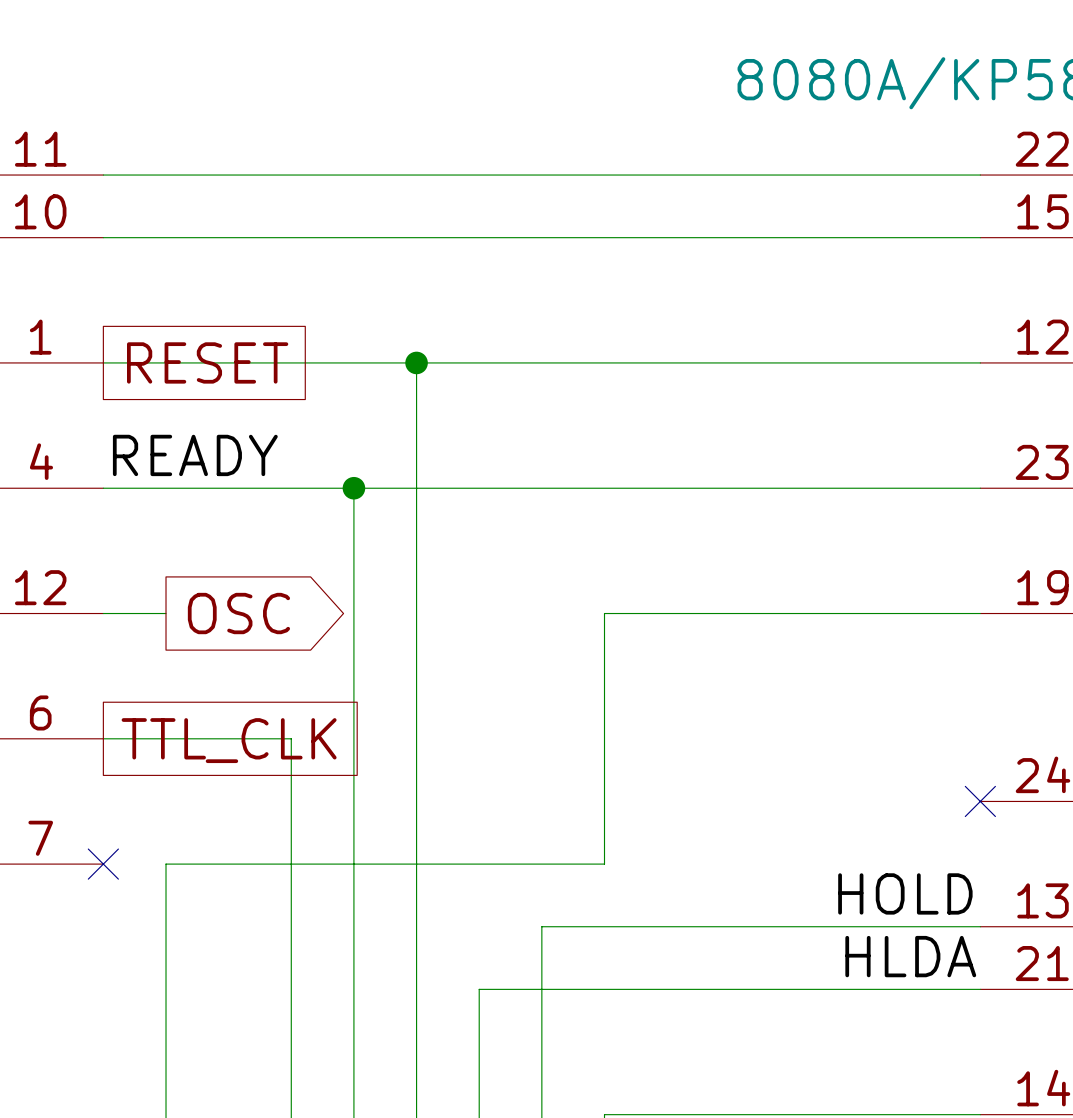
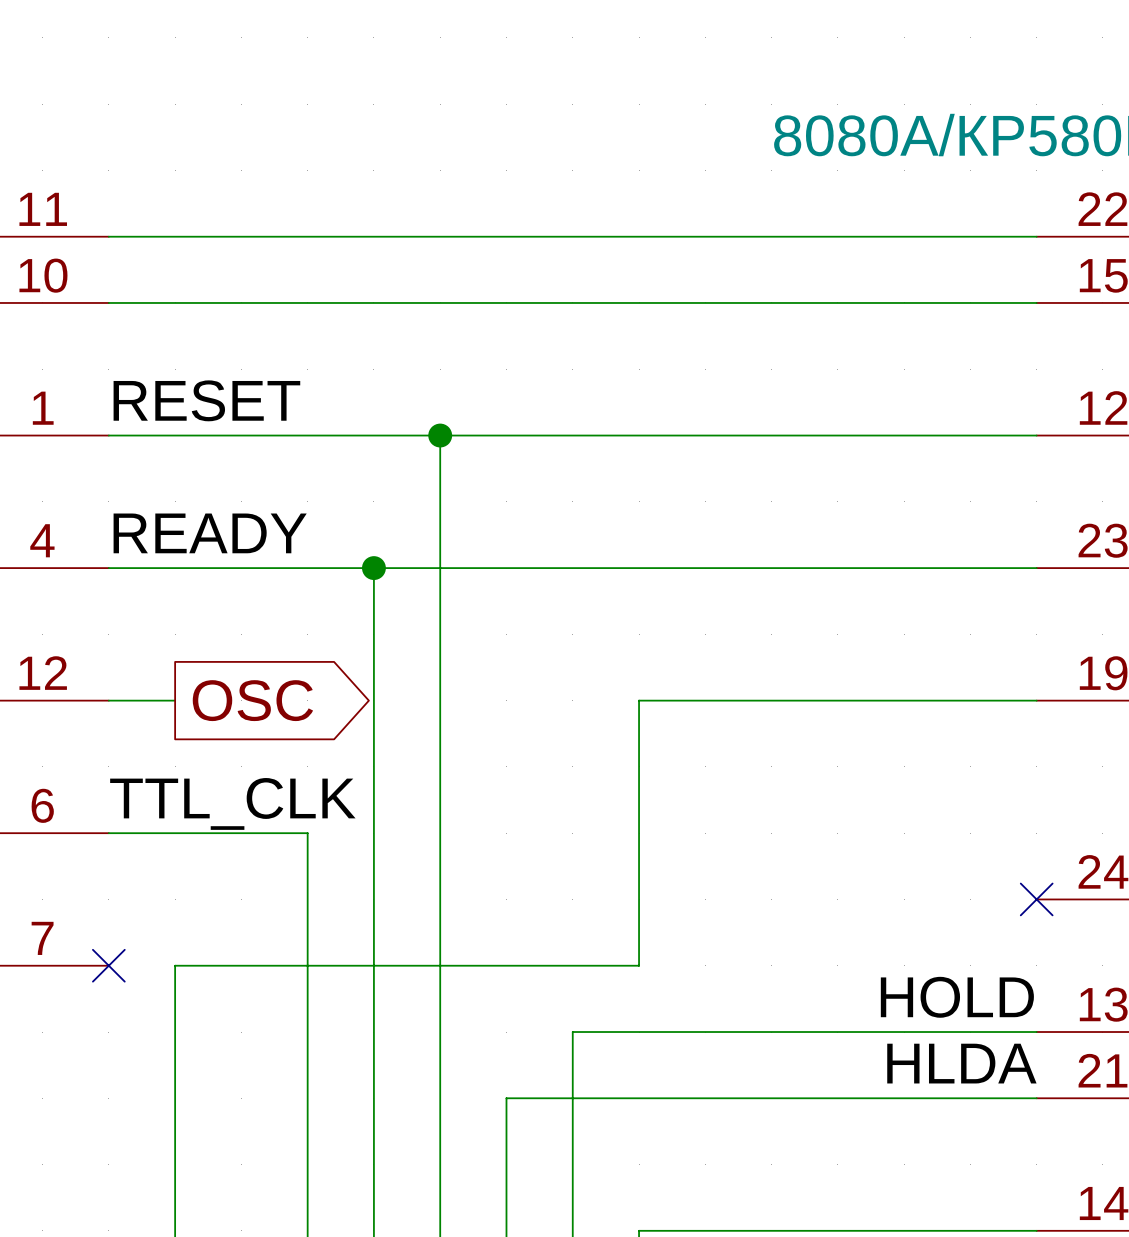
label: none -> RESET (206, 400)
global label: RESET (207, 362) -> none
label: none -> TTL_CLK (232, 803)
global label: TTL_CLK (229, 740) -> none

